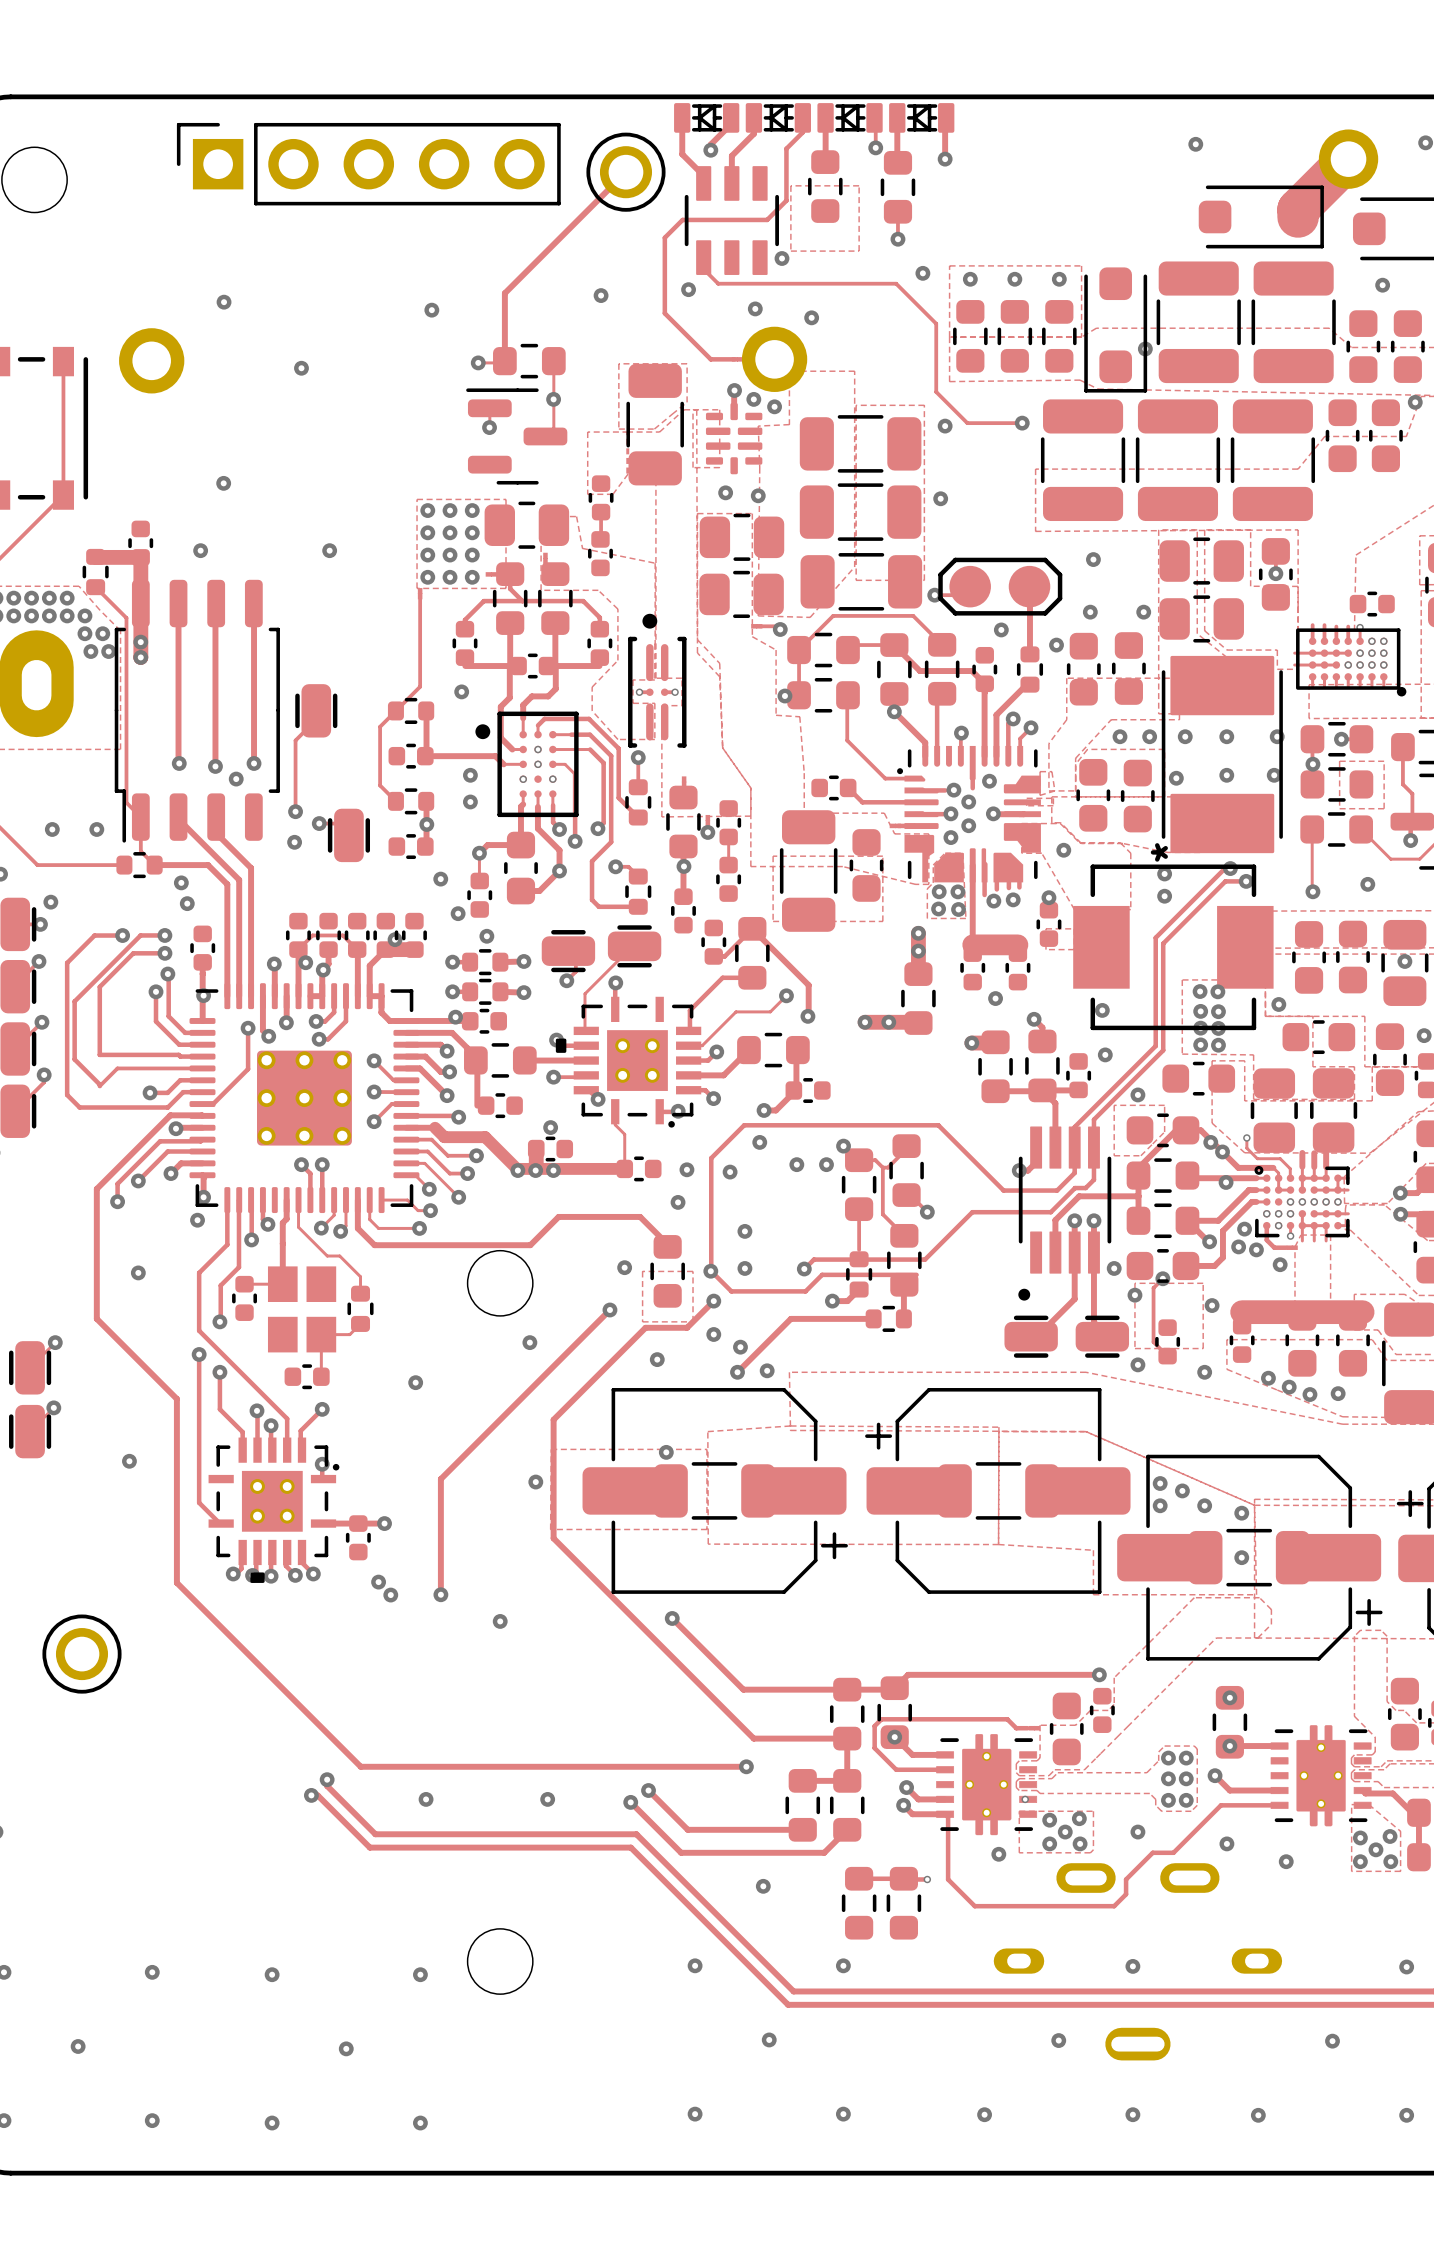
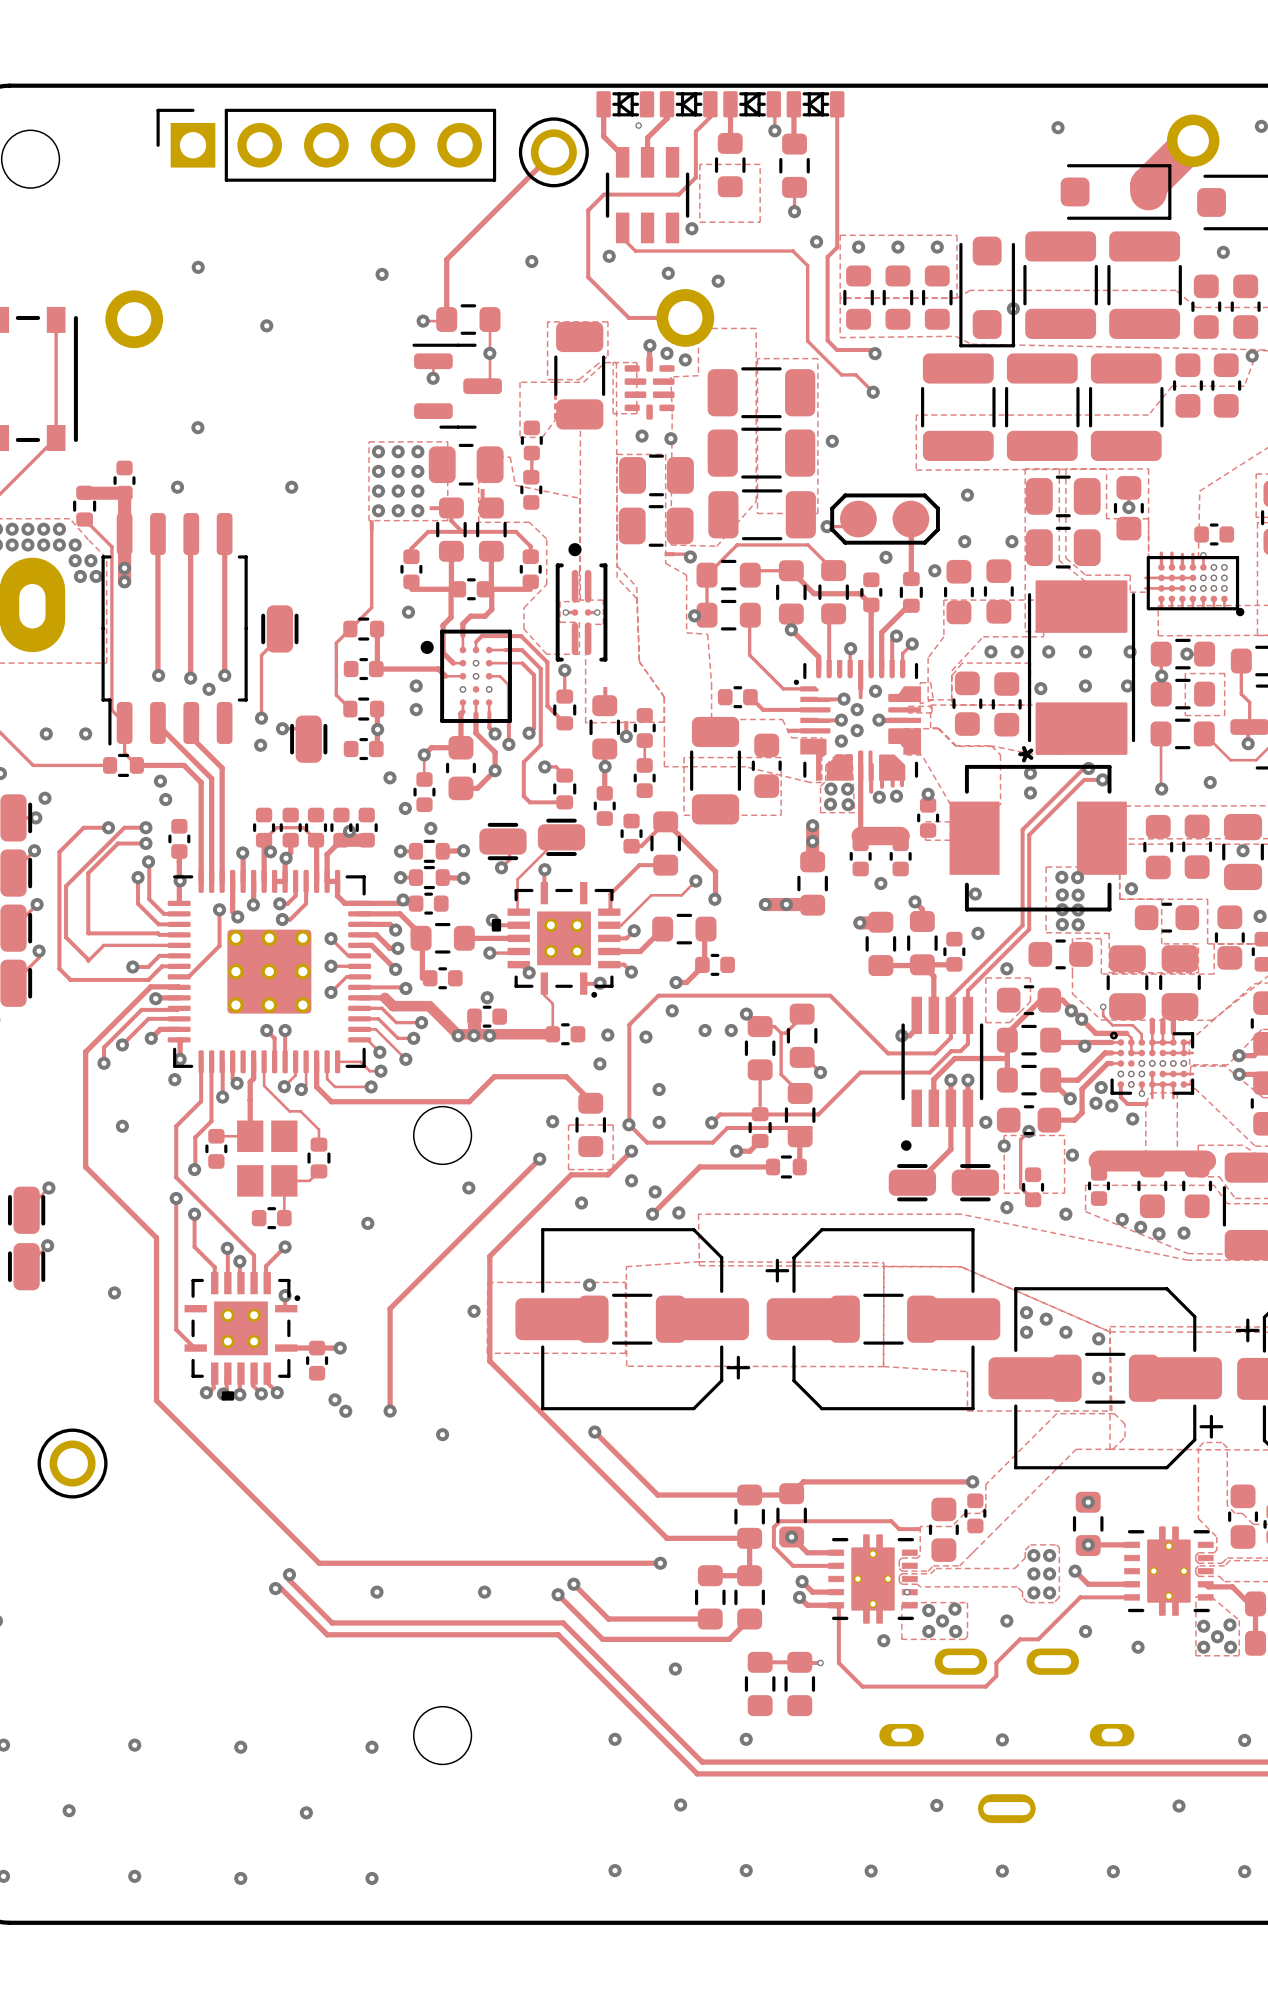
track: (946, 117) (945, 159) -> (837, 104) (837, 247) (827, 257) (827, 340) (837, 349) (871, 349) (875, 353)
track: (731, 124) (710, 144) (710, 150) -> none
via size: [703, 142, 719, 158] -> [635, 122, 642, 129]
via: (945, 159) -> none
track: (912, 300) (936, 323) (936, 391) (967, 423) (1022, 423) -> (807, 265) (807, 341) (841, 374) (855, 374) (873, 392)
via: none -> (875, 353)
via: (1022, 423) -> none
via: (945, 426) -> none
via: none -> (873, 392)
via: (1063, 850) -> none

